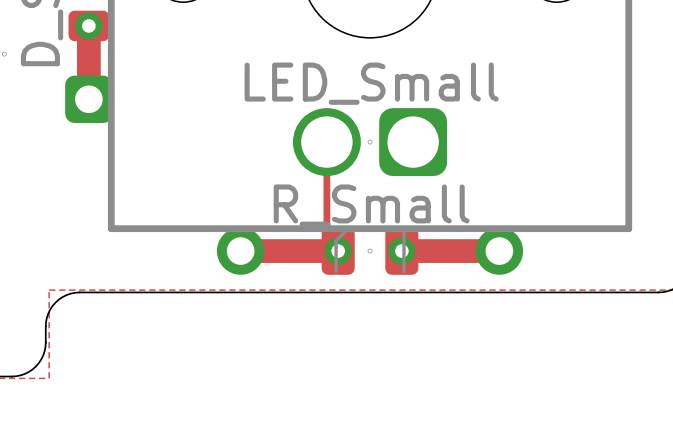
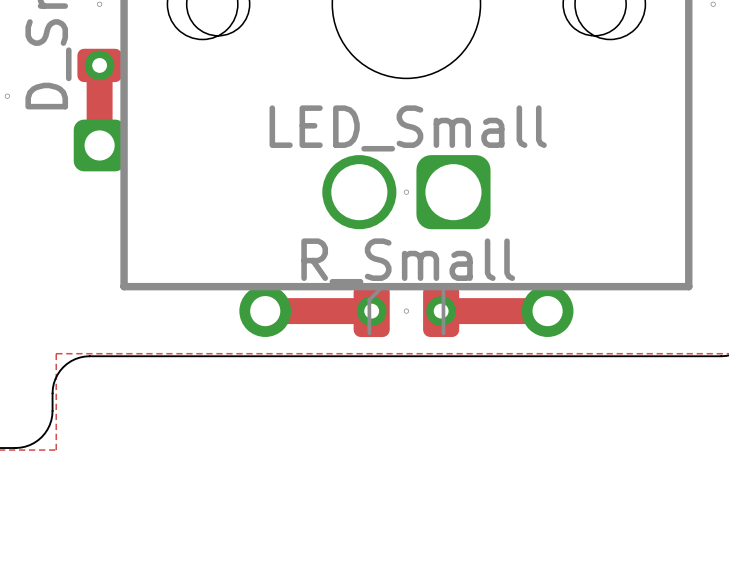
track: (326, 142) (326, 239) -> none

